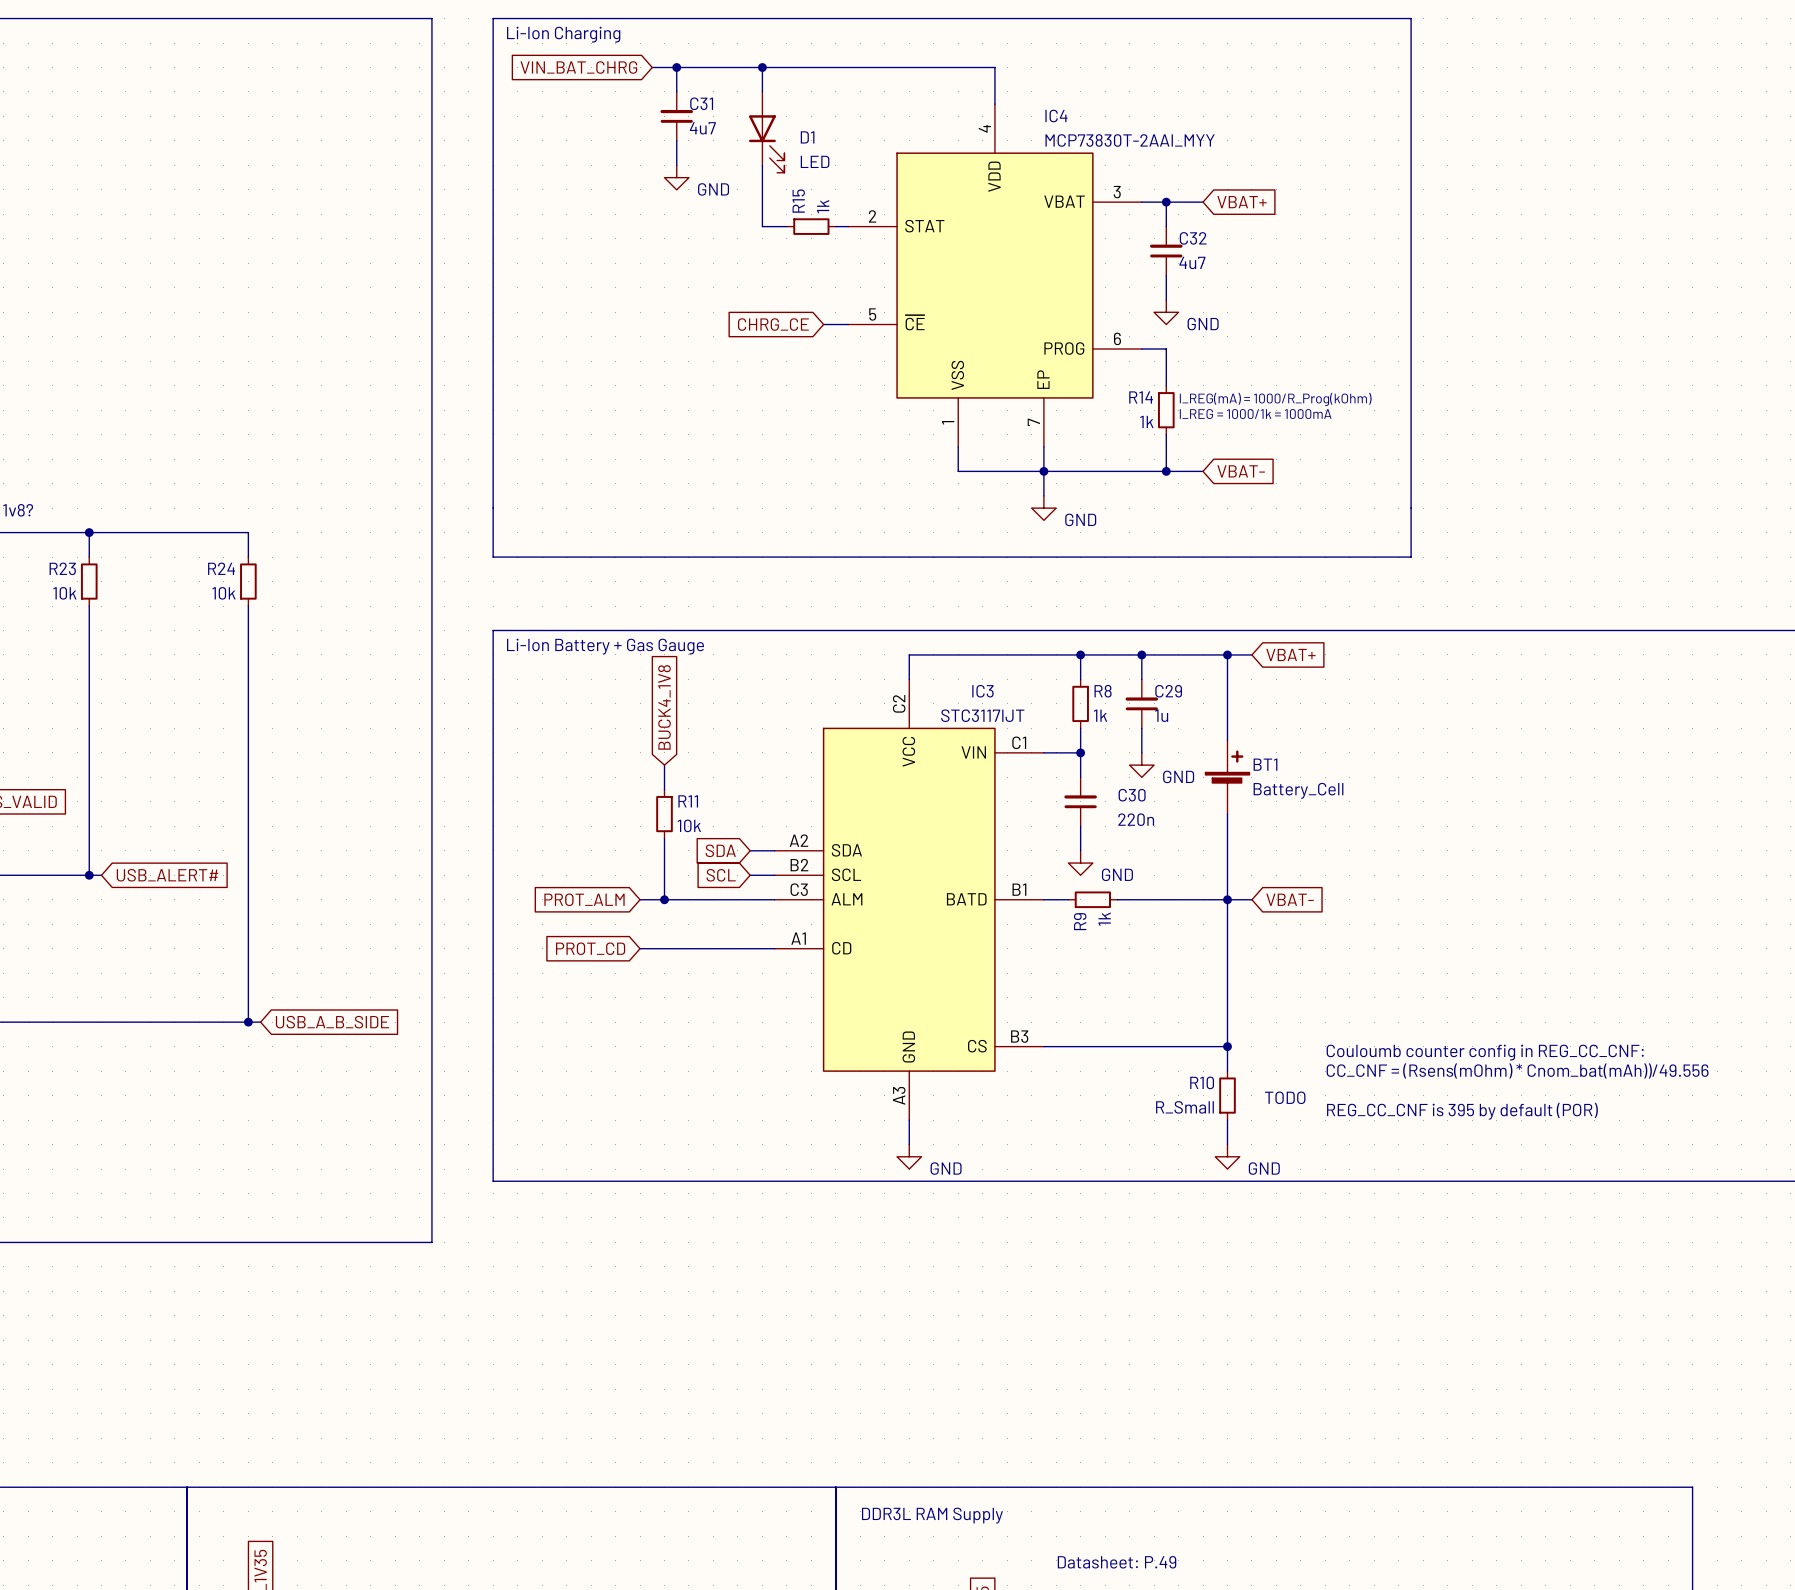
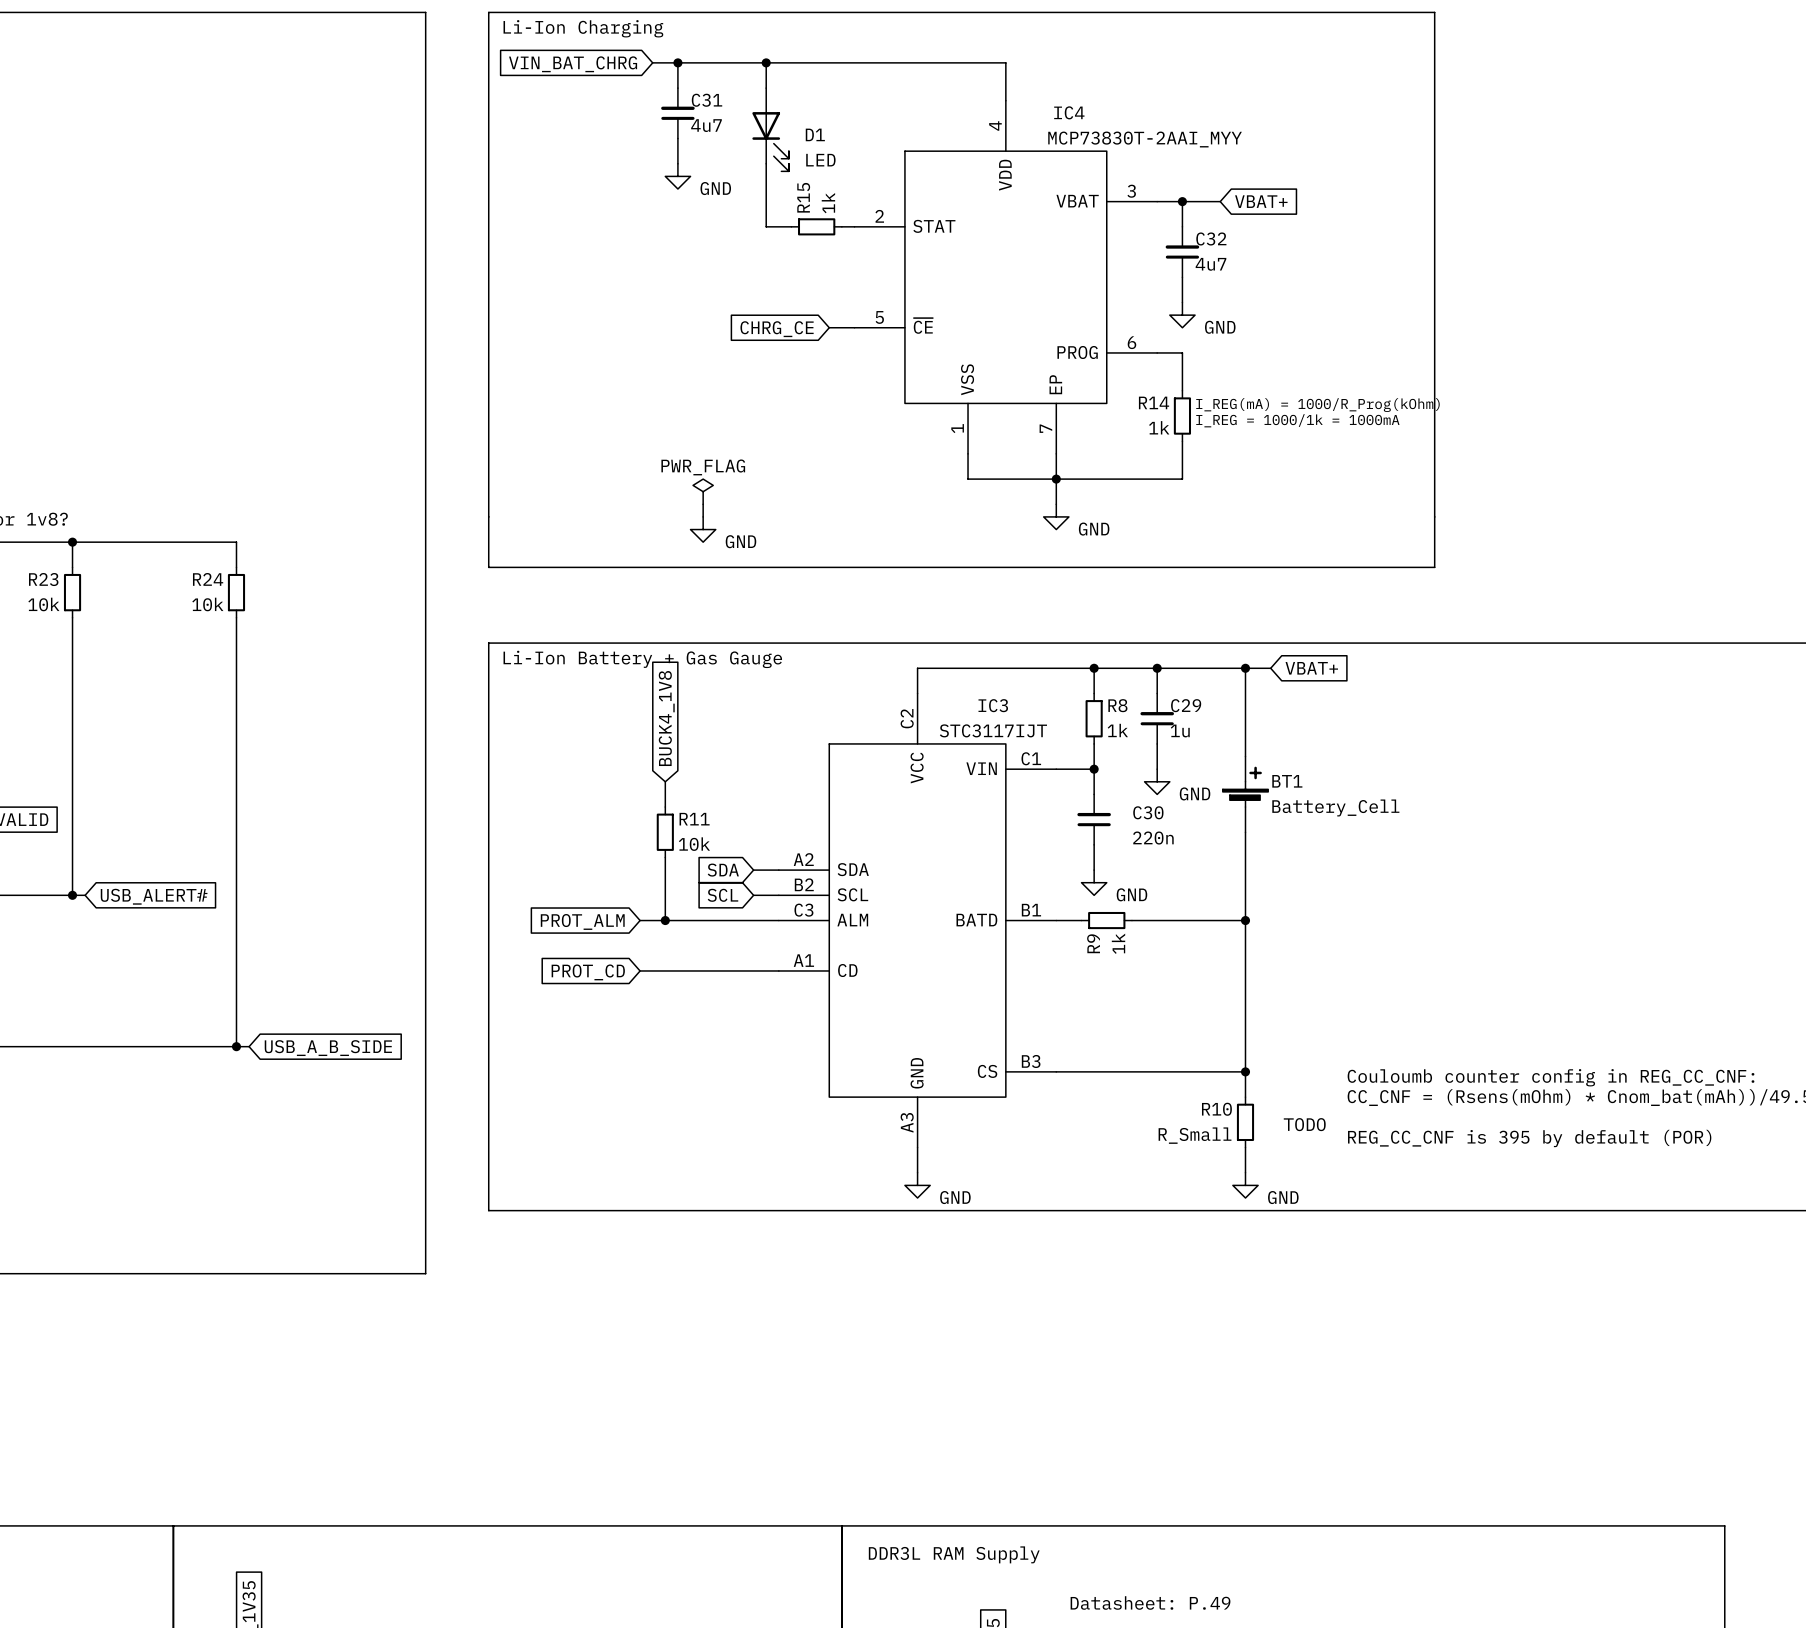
wire: (1166, 471) (1203, 471) -> none
junction: (1166, 471) -> none
global label: VBAT- (1241, 471) -> none
power symbol: none -> PWR_FLAG (703, 491)
wire: none -> (703, 504) (703, 516)
power symbol: none -> GND (703, 529)
wire: (1227, 899) (1251, 899) -> none
global label: VBAT- (1290, 899) -> none

